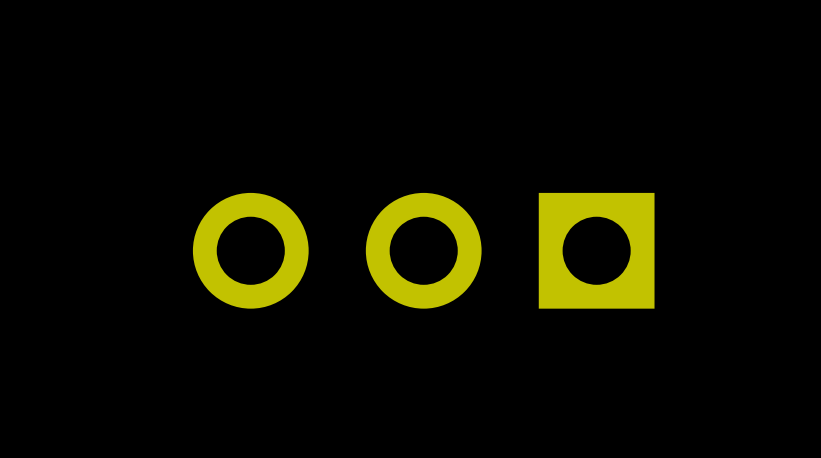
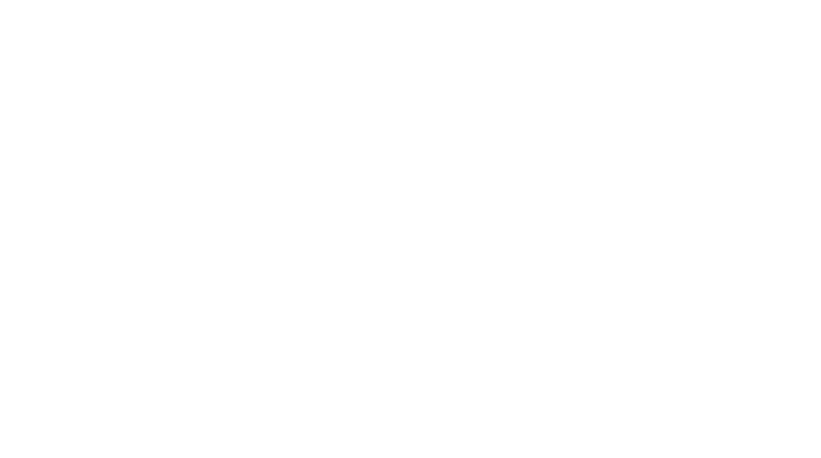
part: (423, 250) -> none

